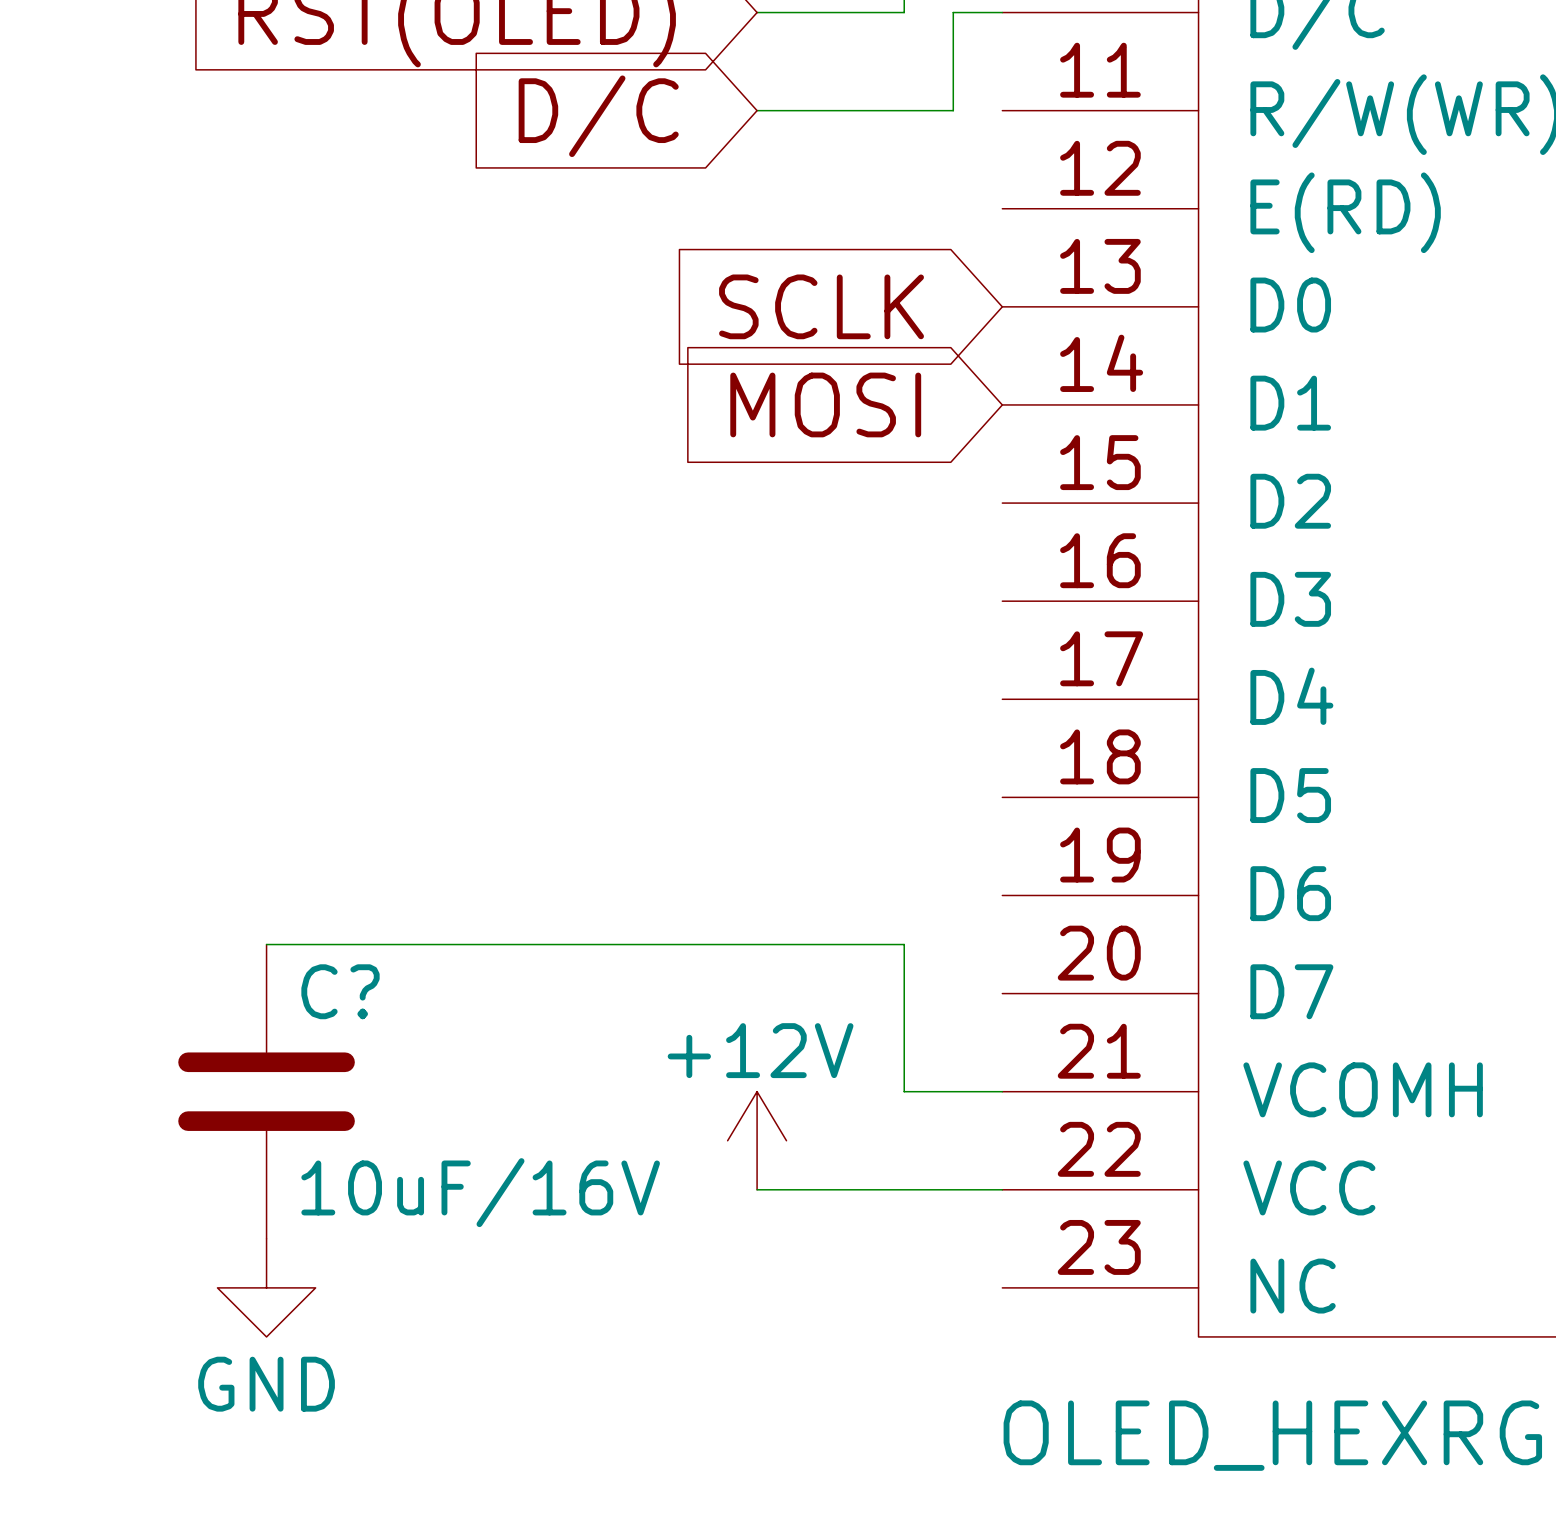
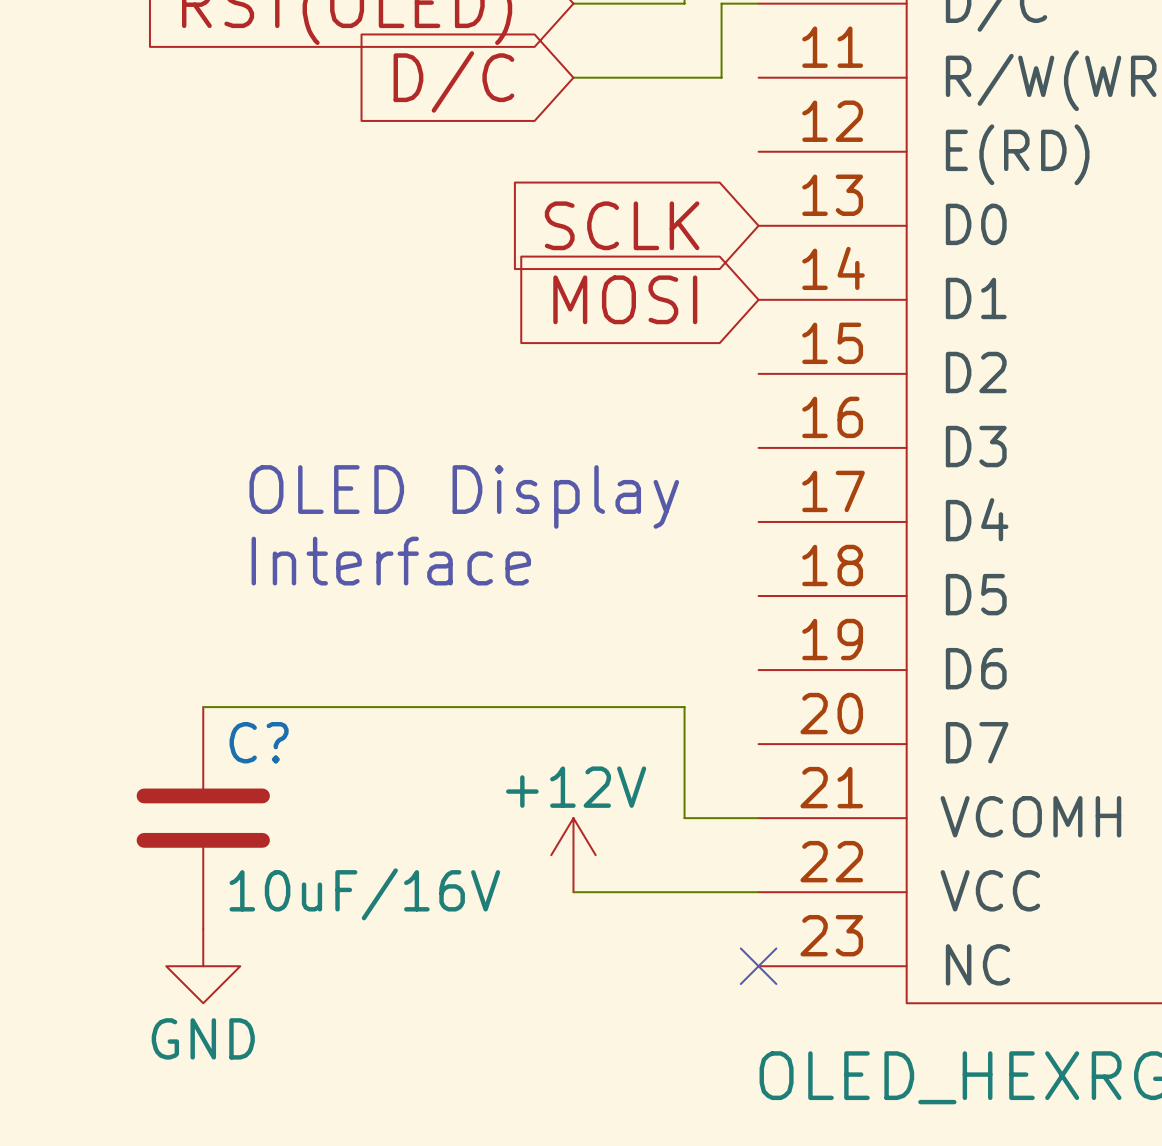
text: none -> OLED Display (464, 496)
text: none -> Interface (391, 561)
no-connect mark: none -> (758, 966)

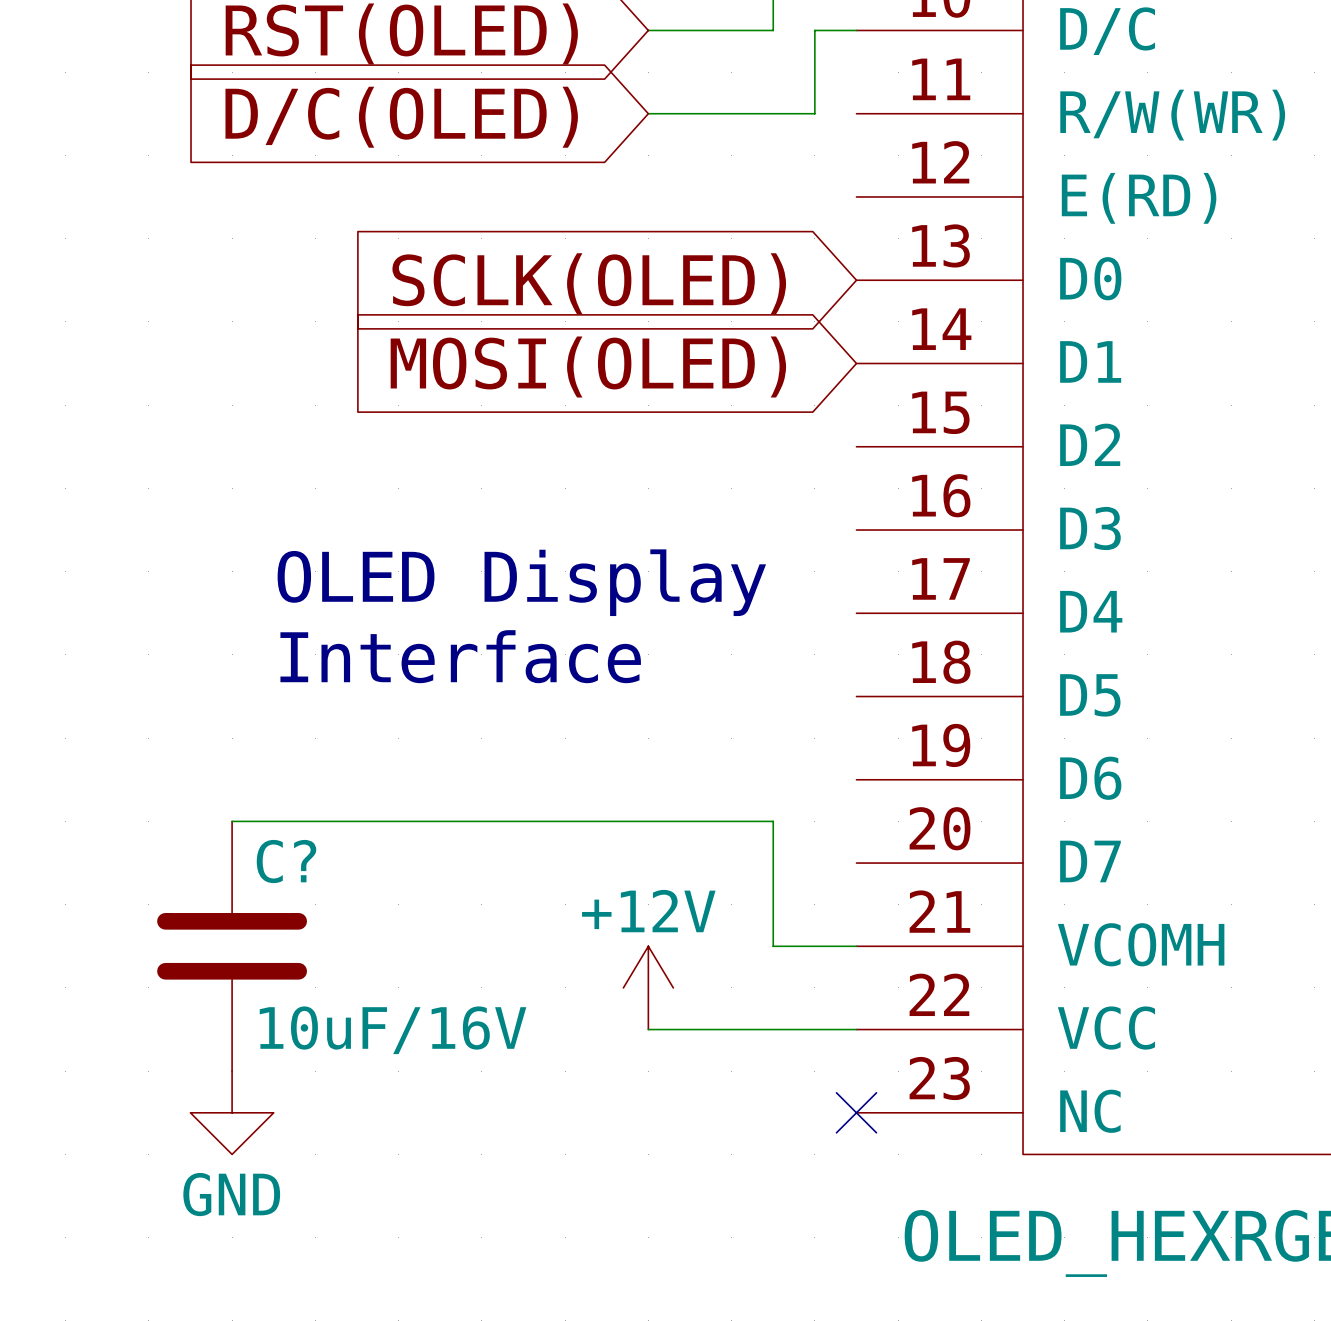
global label: D/C (453, 81) -> D/C(OLED) (401, 117)
global label: SCLK (622, 225) -> SCLK(OLED) (589, 283)
global label: MOSI (625, 299) -> MOSI(OLED) (588, 367)

